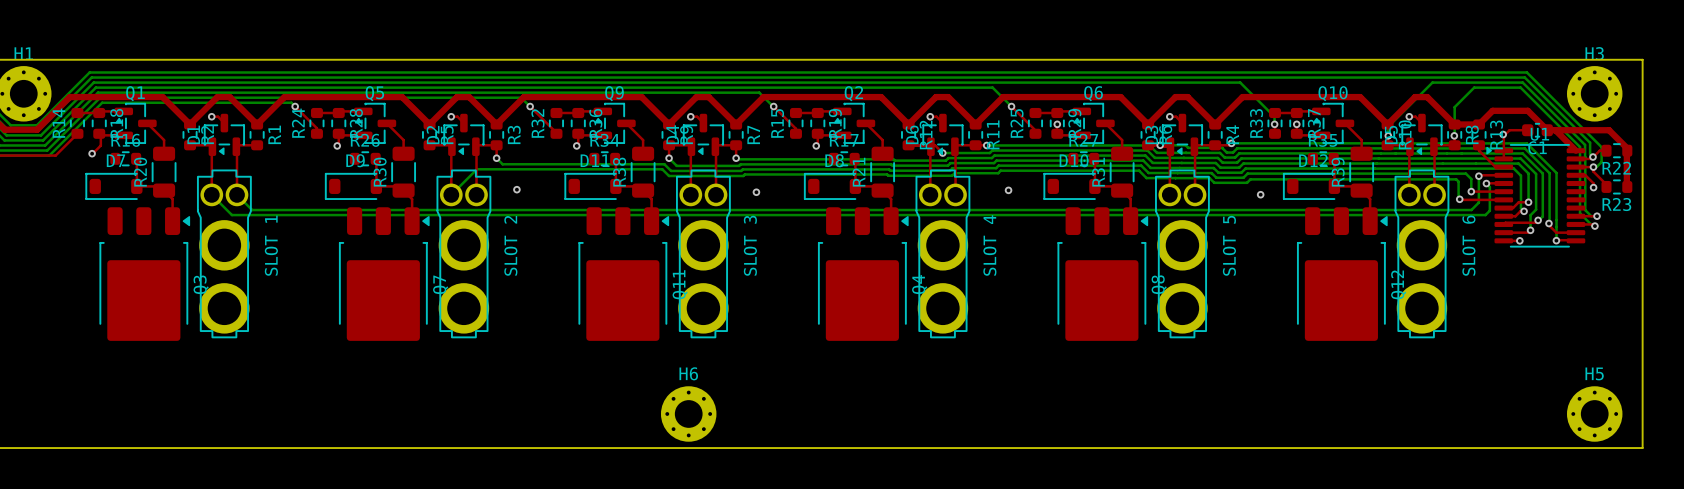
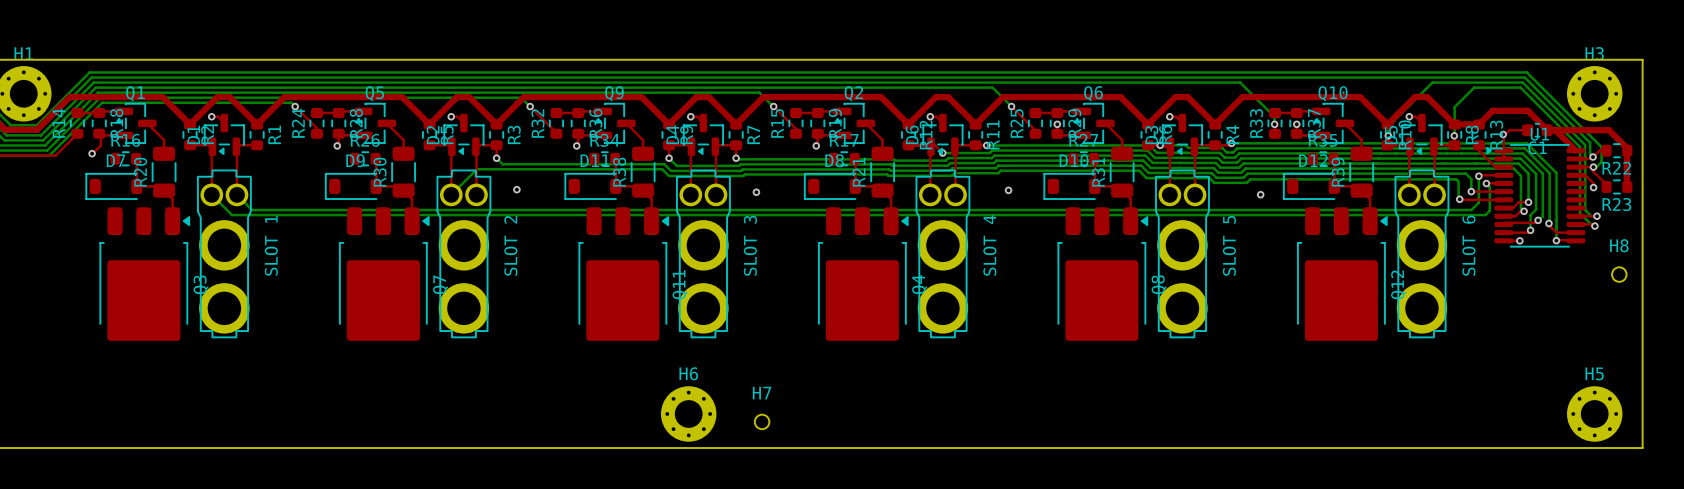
H8: none -> (1619, 274)
H7: none -> (762, 421)

